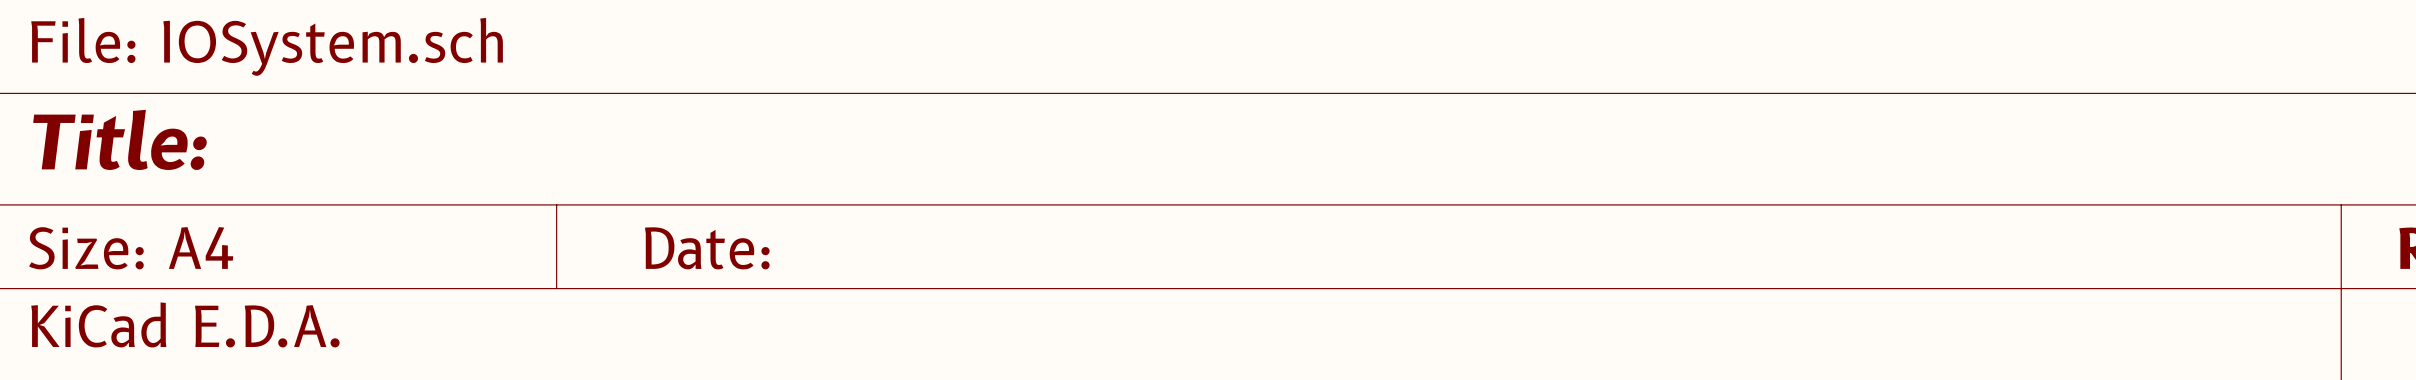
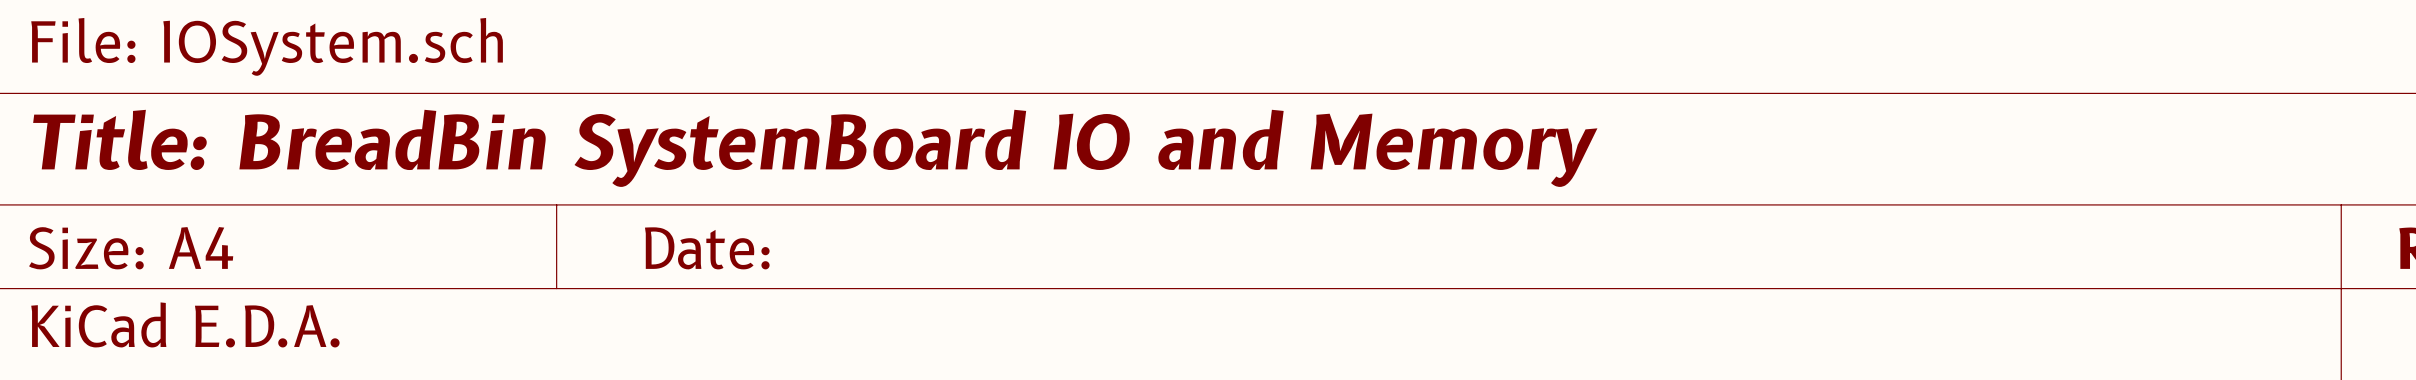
title block: Title: (120, 139) -> Title: BreadBin SystemBoard IO and Memory (815, 148)

